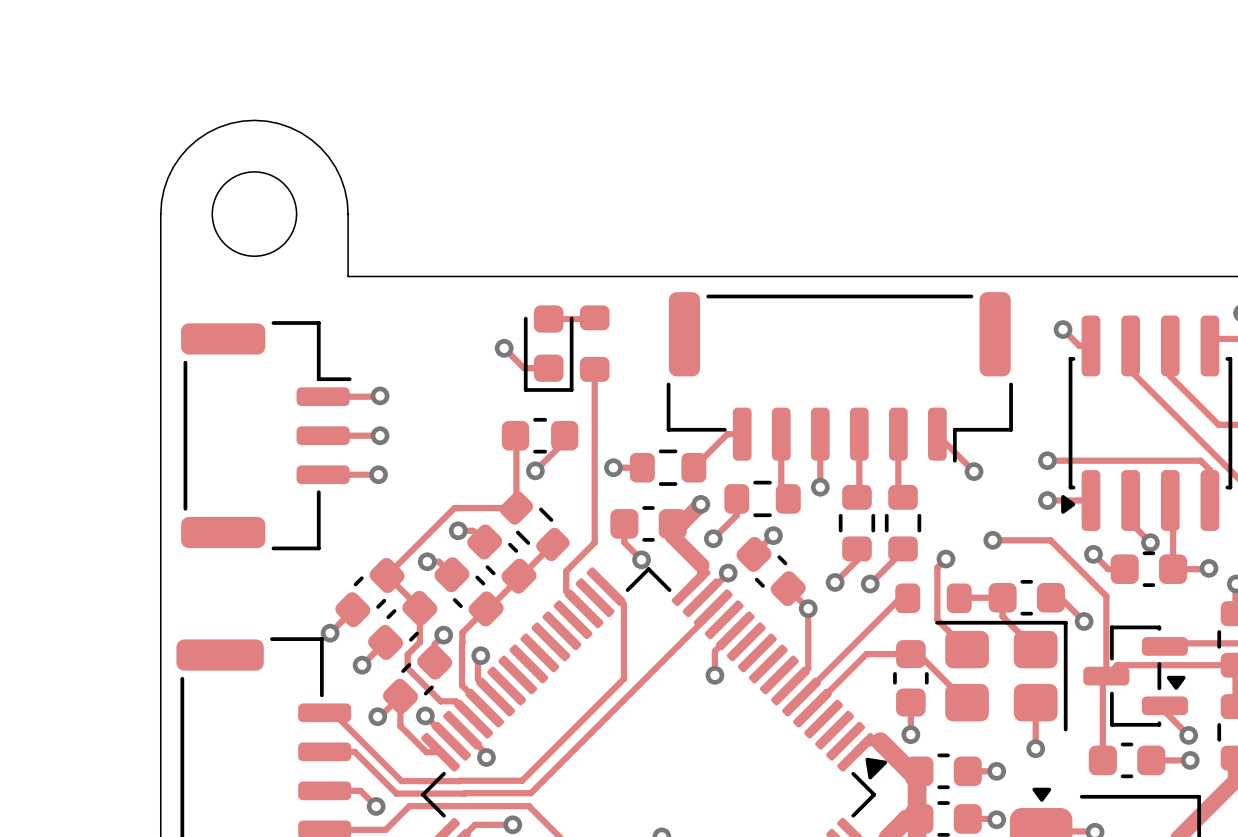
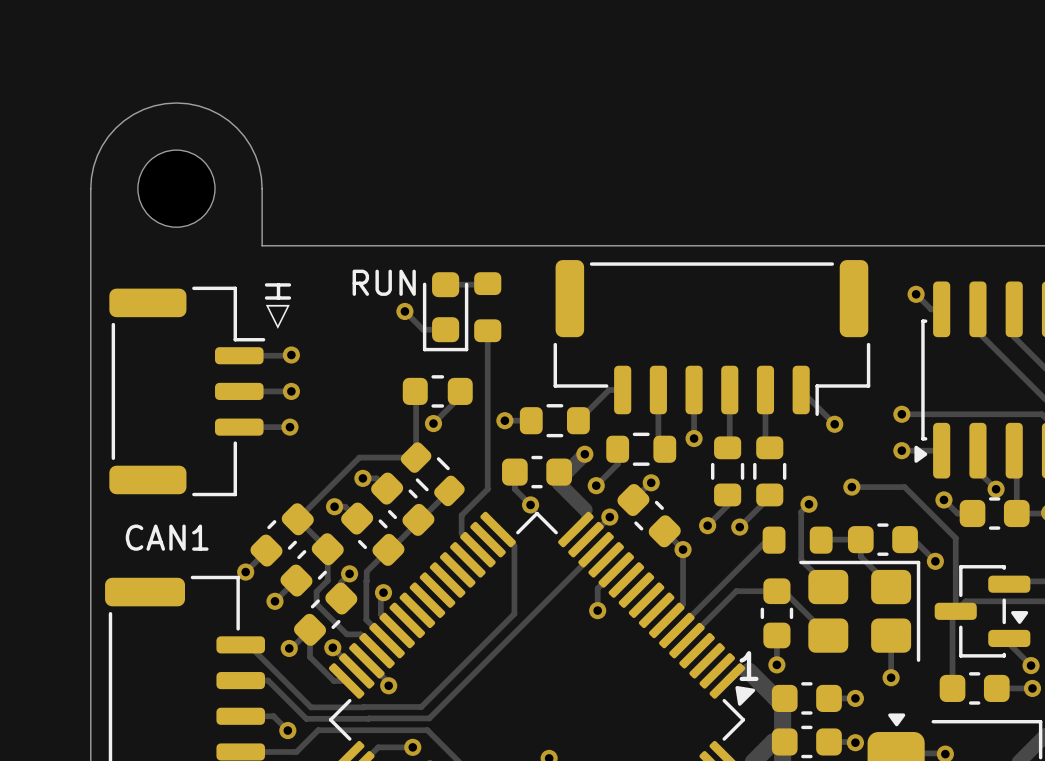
text: none -> RUN (384, 282)
text: none -> H (277, 291)
text: none -> △ (277, 316)
text: none -> CAN1 (167, 537)
text: none -> 1 (749, 666)

